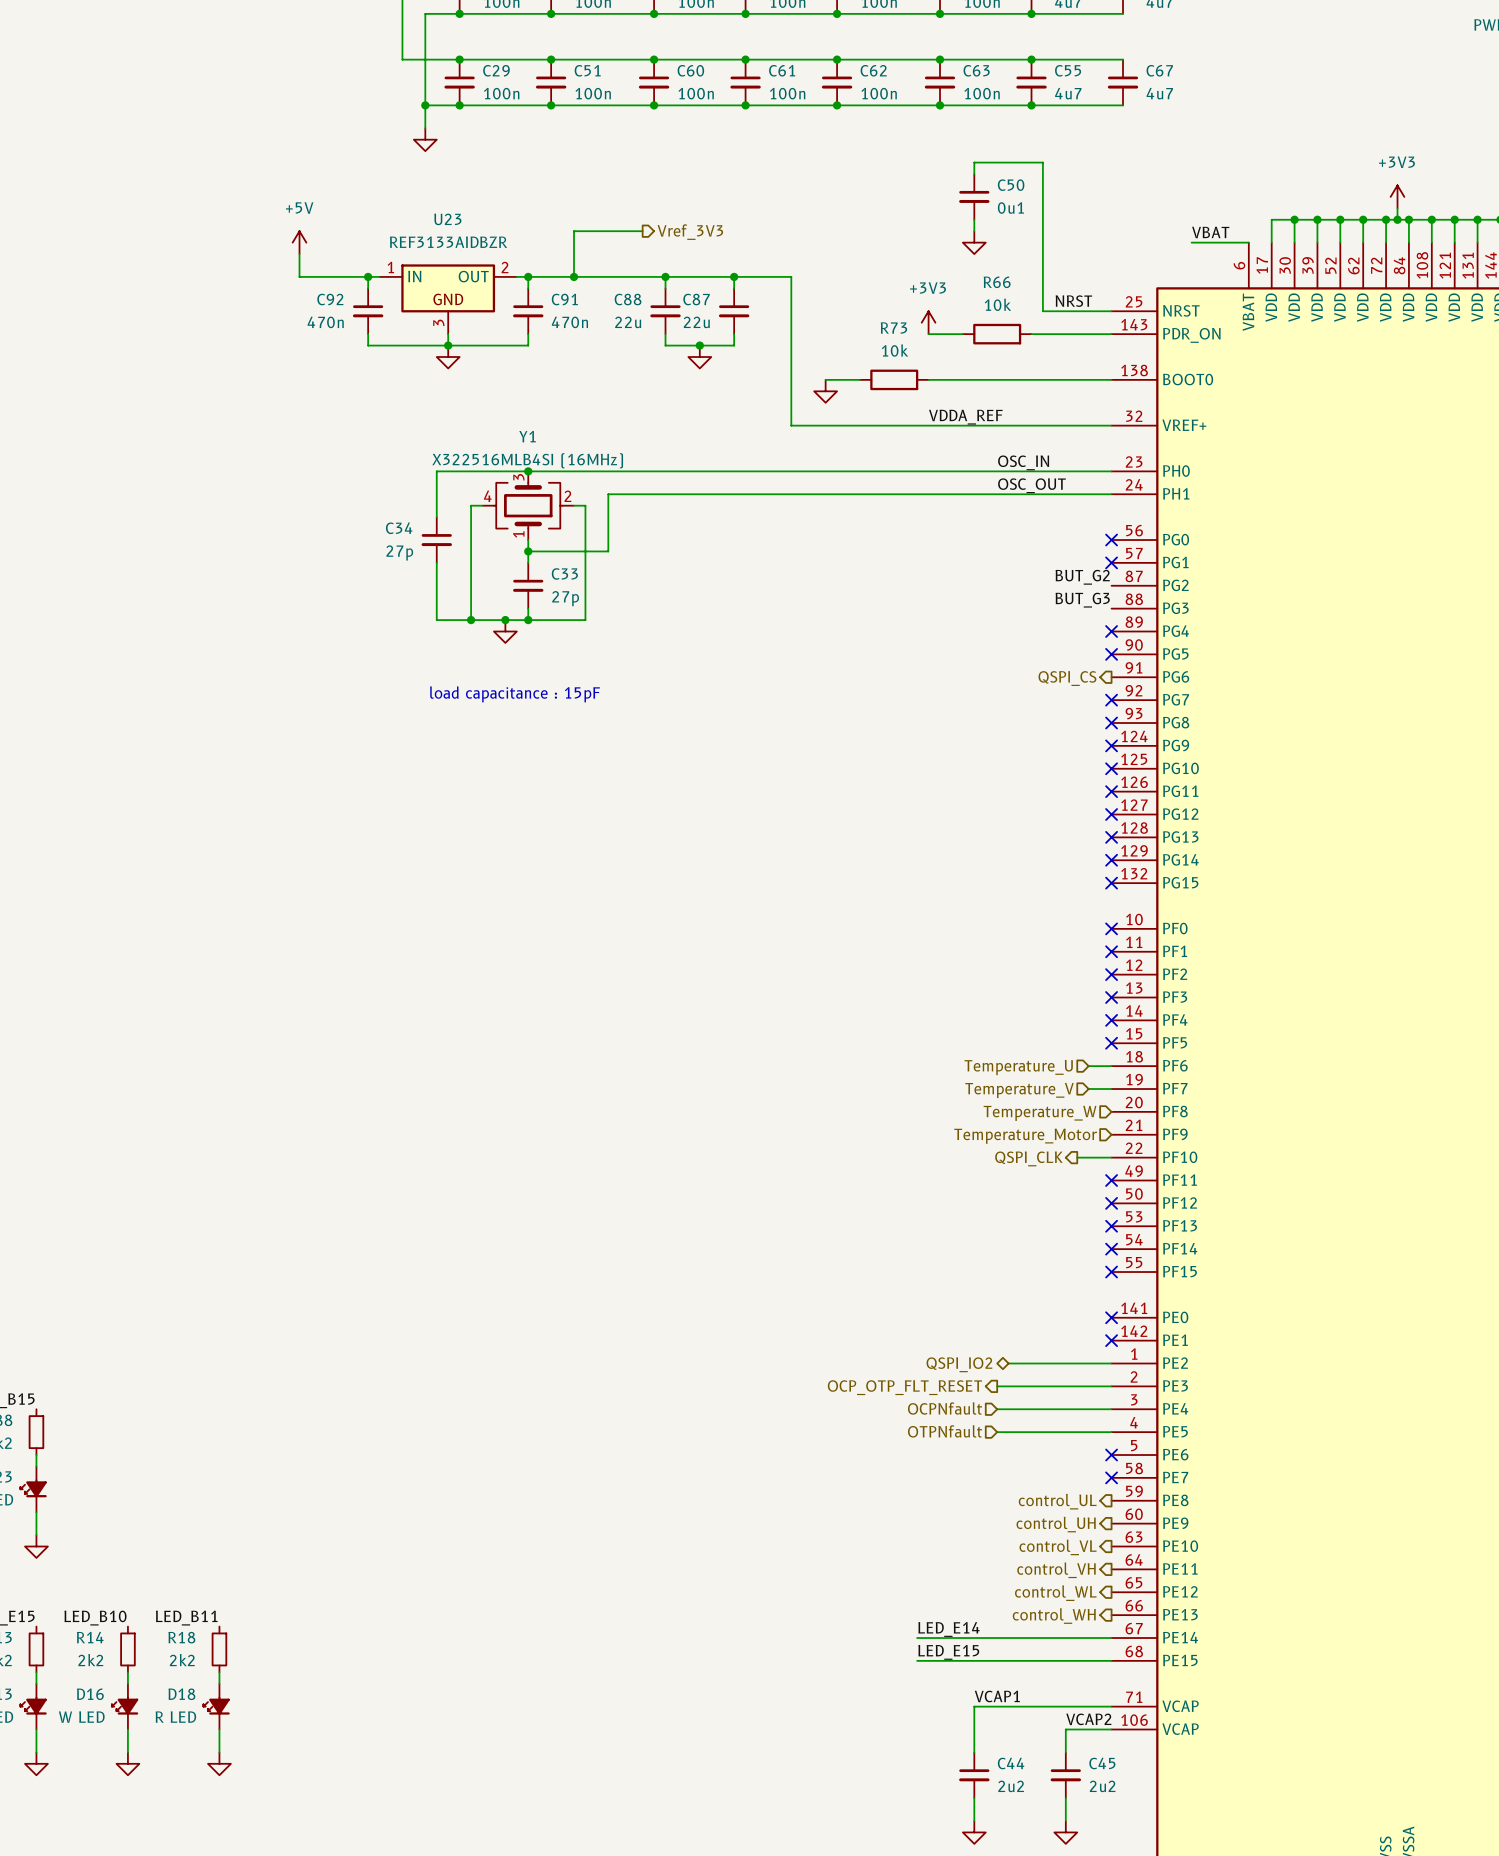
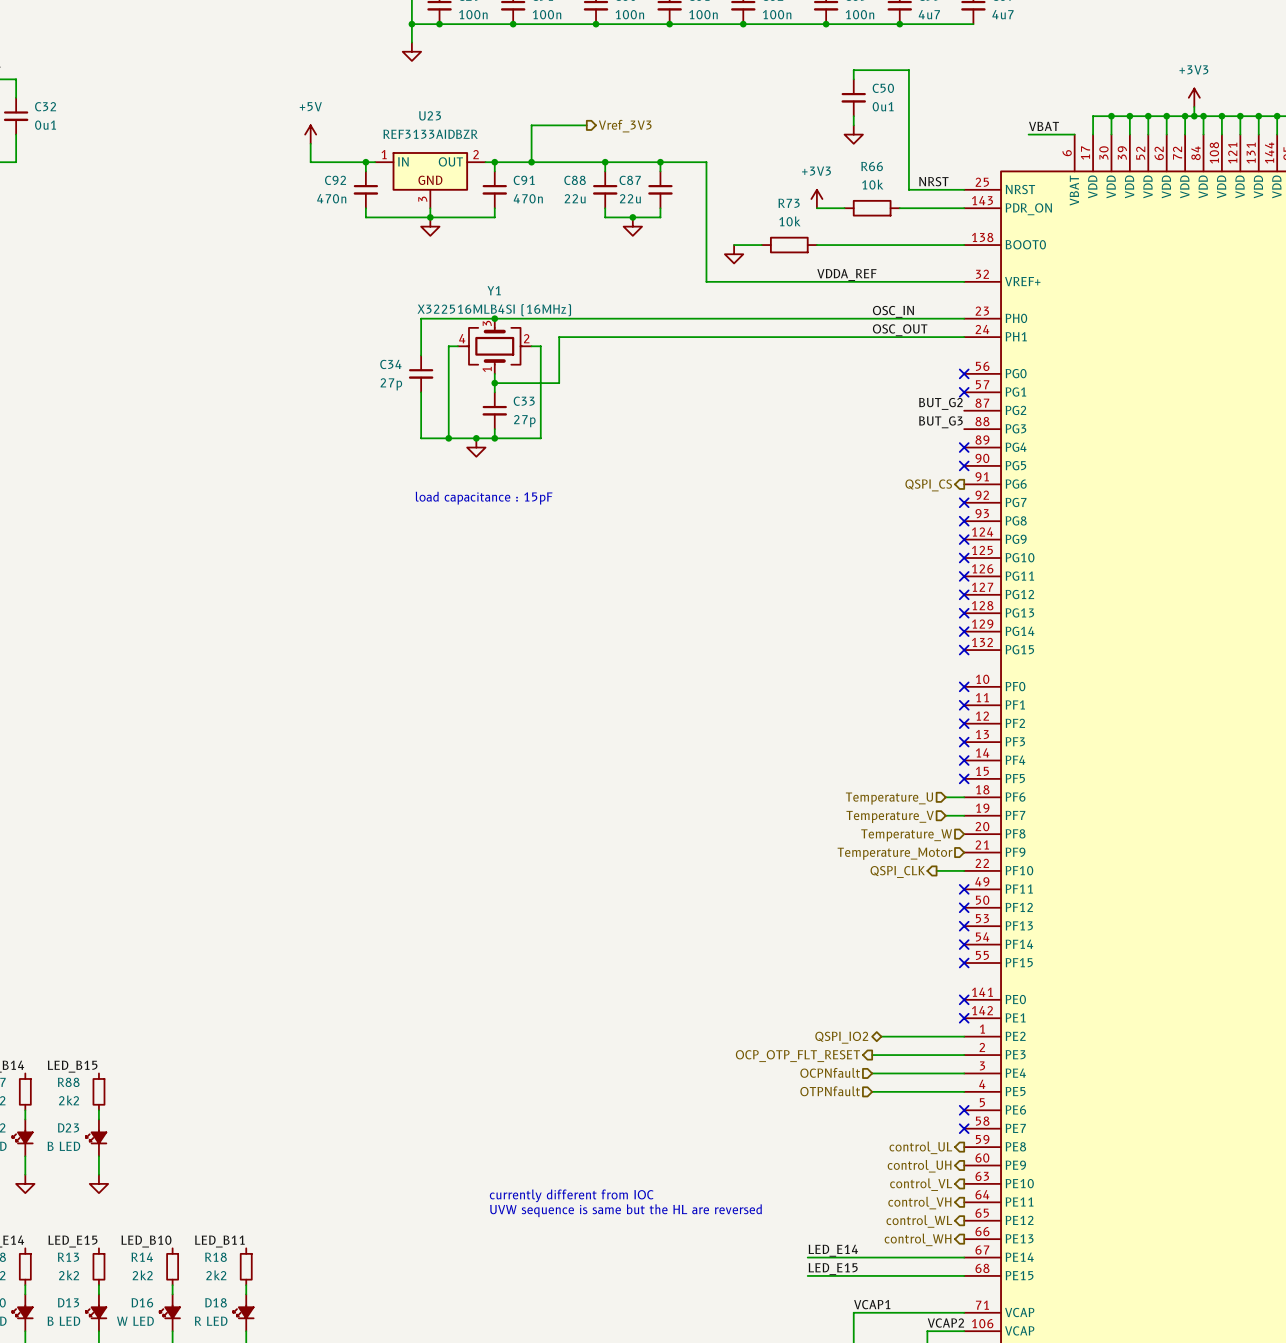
text: none -> currently different from IOC (571, 1195)
text: none -> UVW sequence is same but the HL are reversed (626, 1210)

